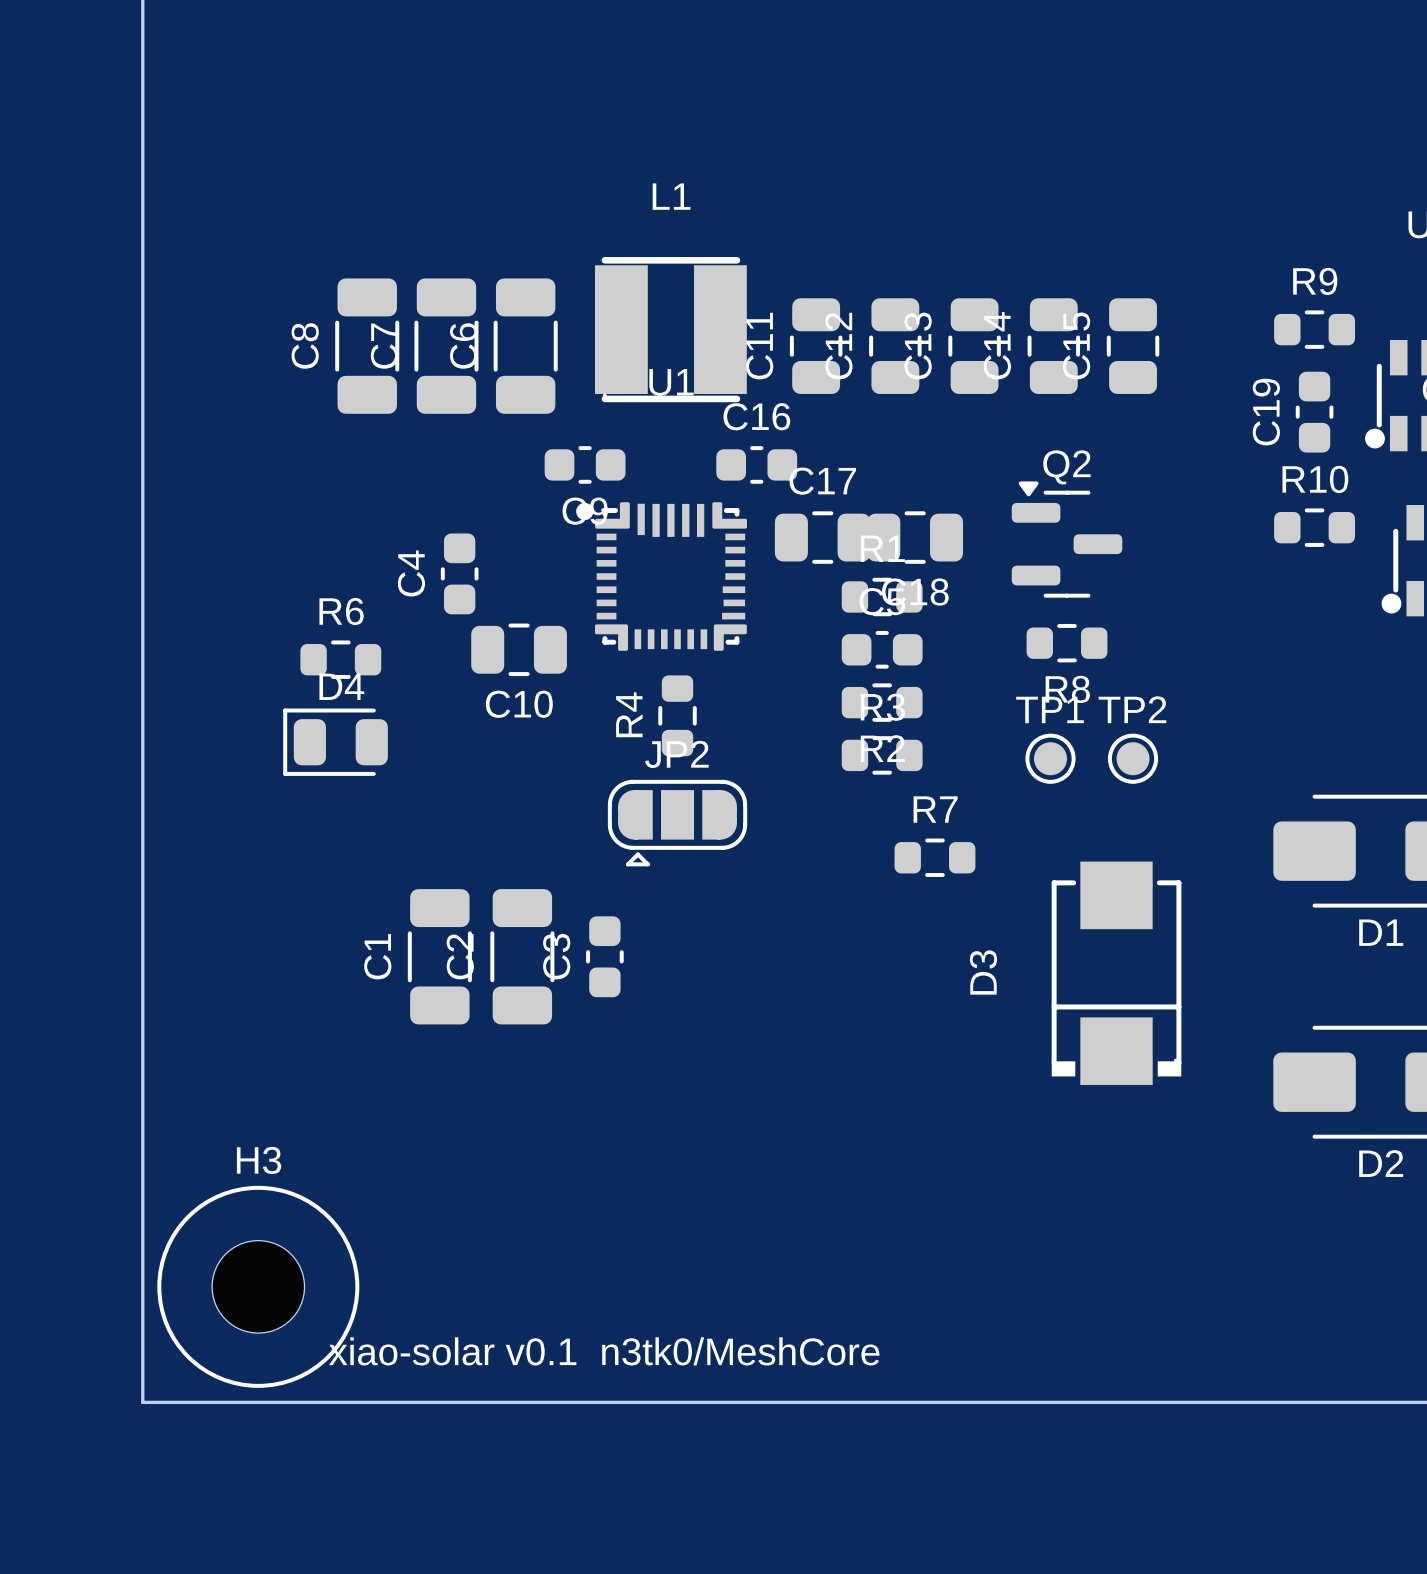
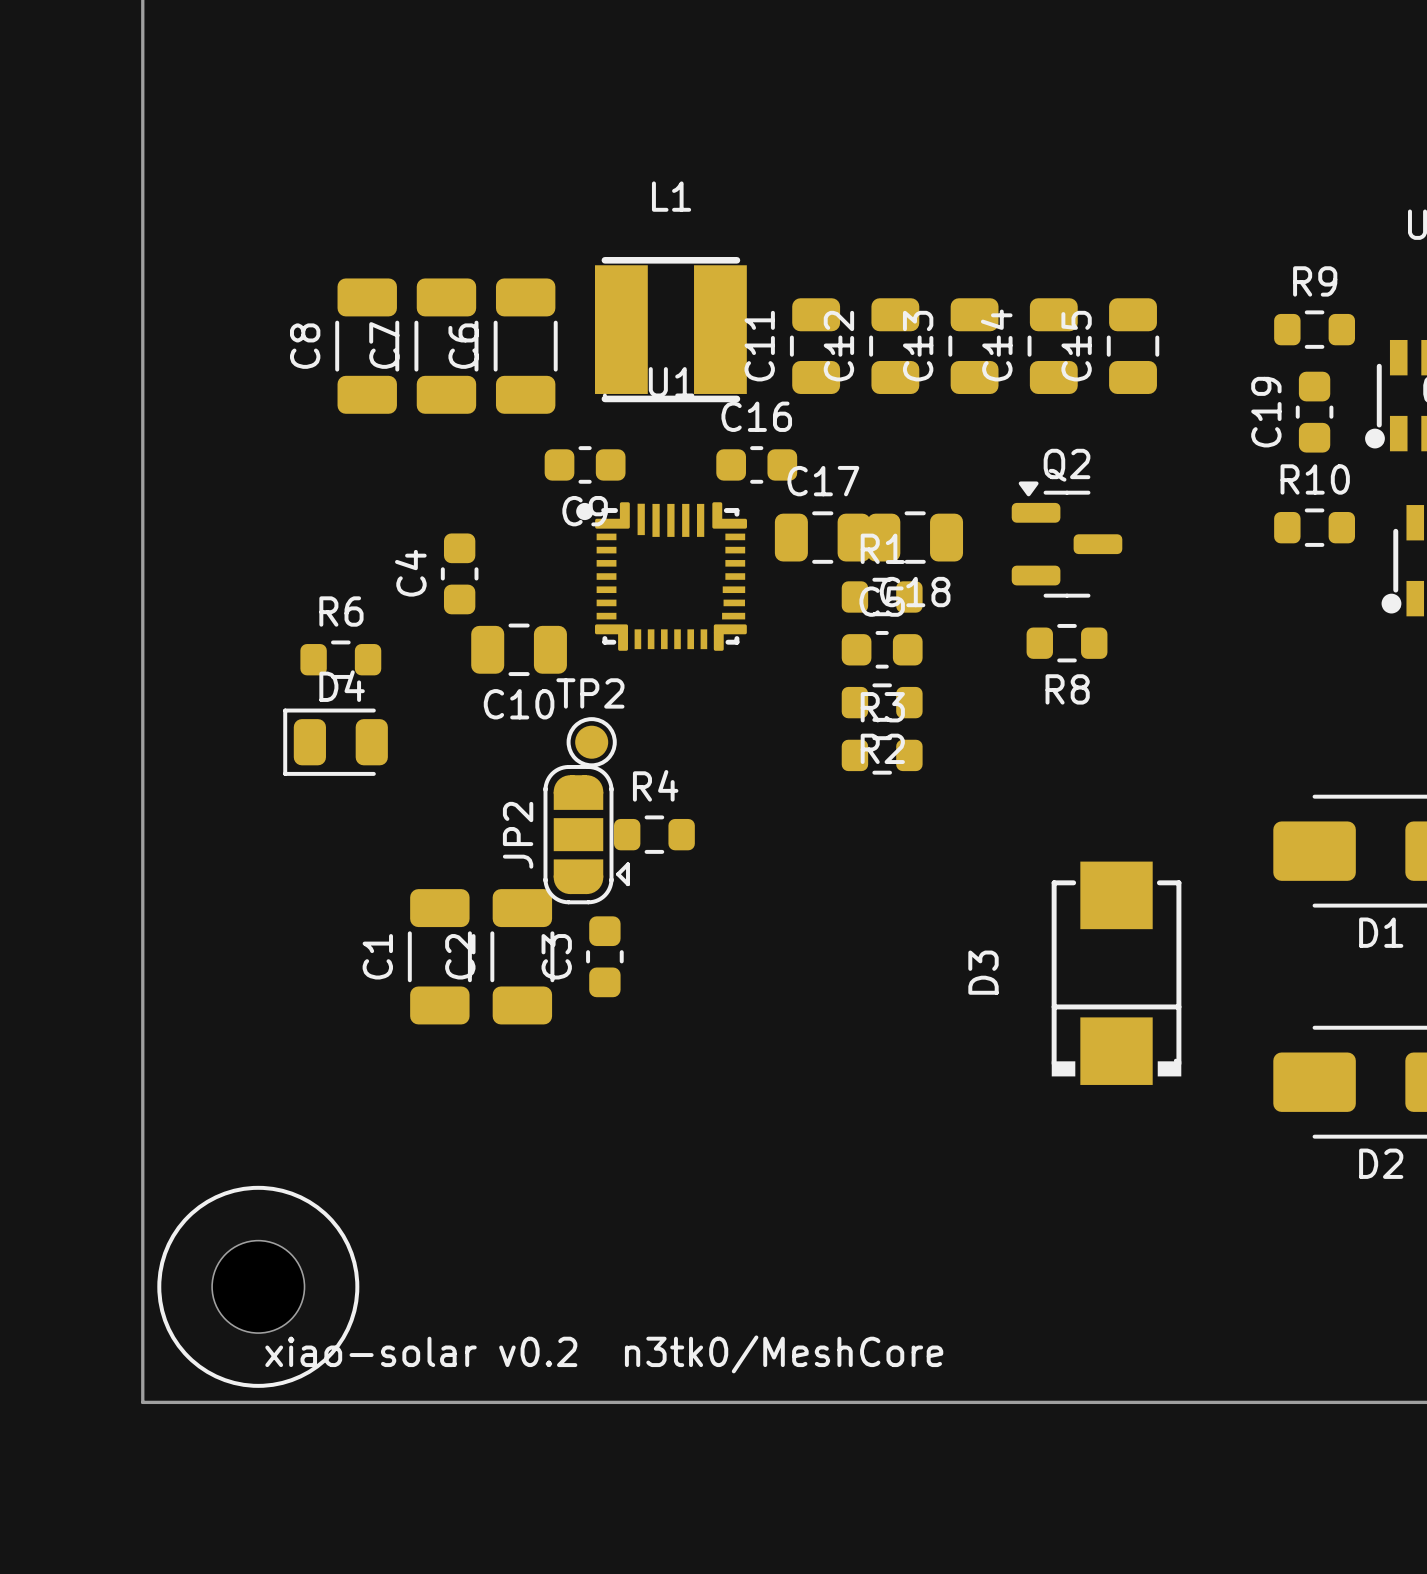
R4 rotation: 0° (677, 715) -> 90° clockwise (654, 834)
R4 position: (677, 715) -> (654, 834)
TP1: (1050, 758) -> none
TP2 position: (1133, 758) -> (591, 742)
JP2 rotation: 0° (677, 823) -> 90° counterclockwise (586, 834)
JP2 position: (677, 823) -> (586, 834)
R7: (934, 857) -> none
H3 name: H3 (259, 1160) -> none
text: xiao-solar v0.1 n3tk0/MeshCore (604, 1351) -> xiao-solar v0.2 n3tk0/MeshCore (604, 1354)

